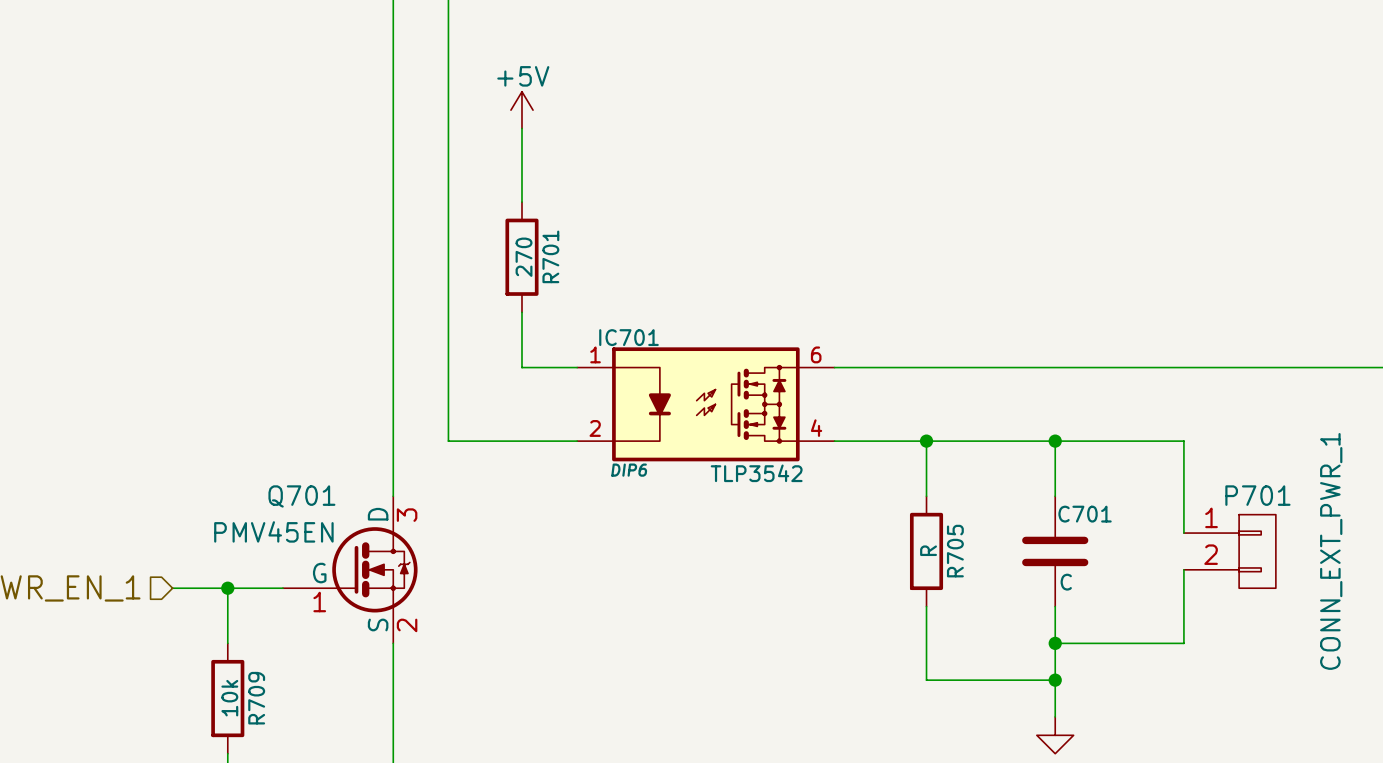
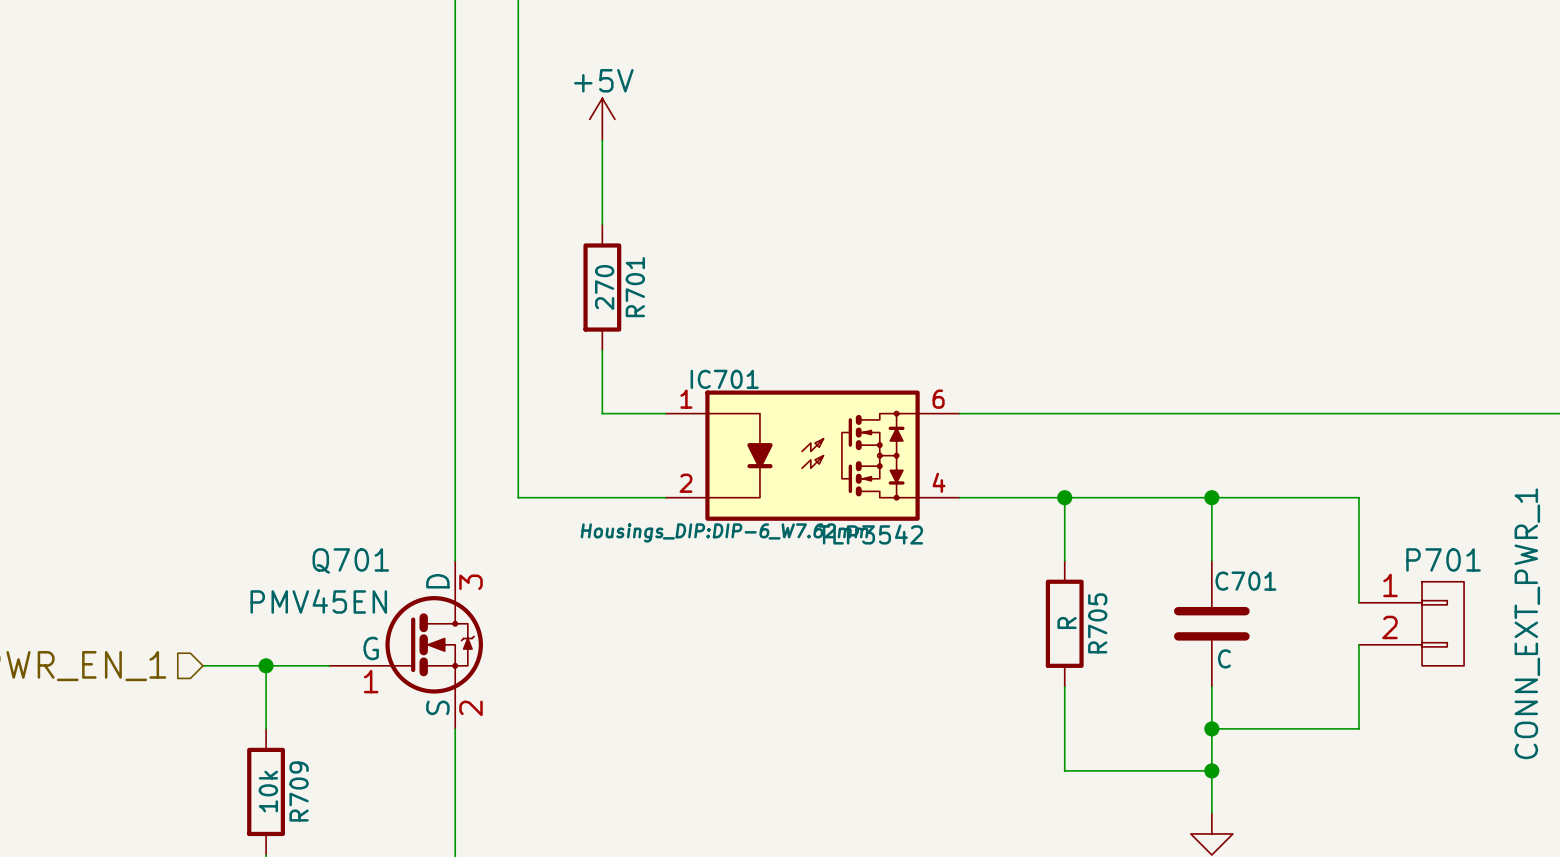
IC701 text: DIP6 (629, 470) -> Housings_DIP:DIP-6_W7.62mm (724, 532)

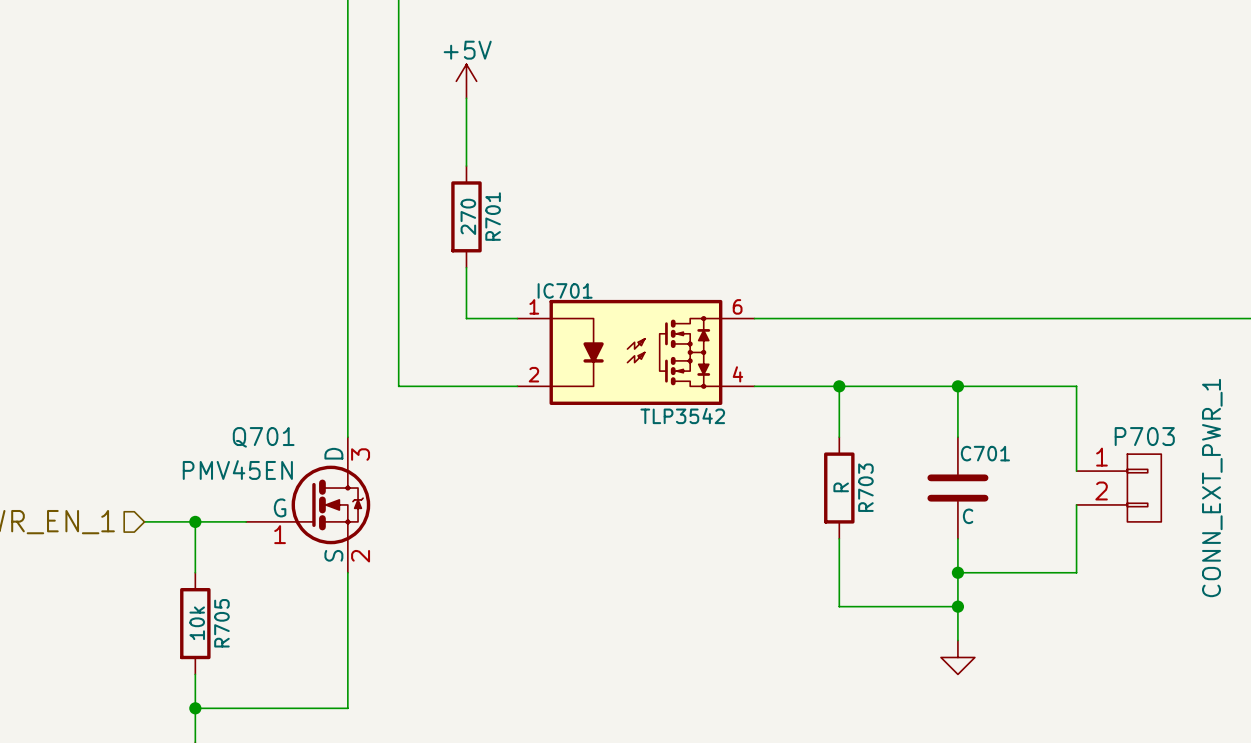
IC701 text: Housings_DIP:DIP-6_W7.62mm (724, 532) -> none
P701 name: P701 (1443, 559) -> P703 (1144, 436)
R705 name: R705 (1097, 623) -> R703 (865, 487)
R709 name: R709 (299, 791) -> R705 (221, 623)

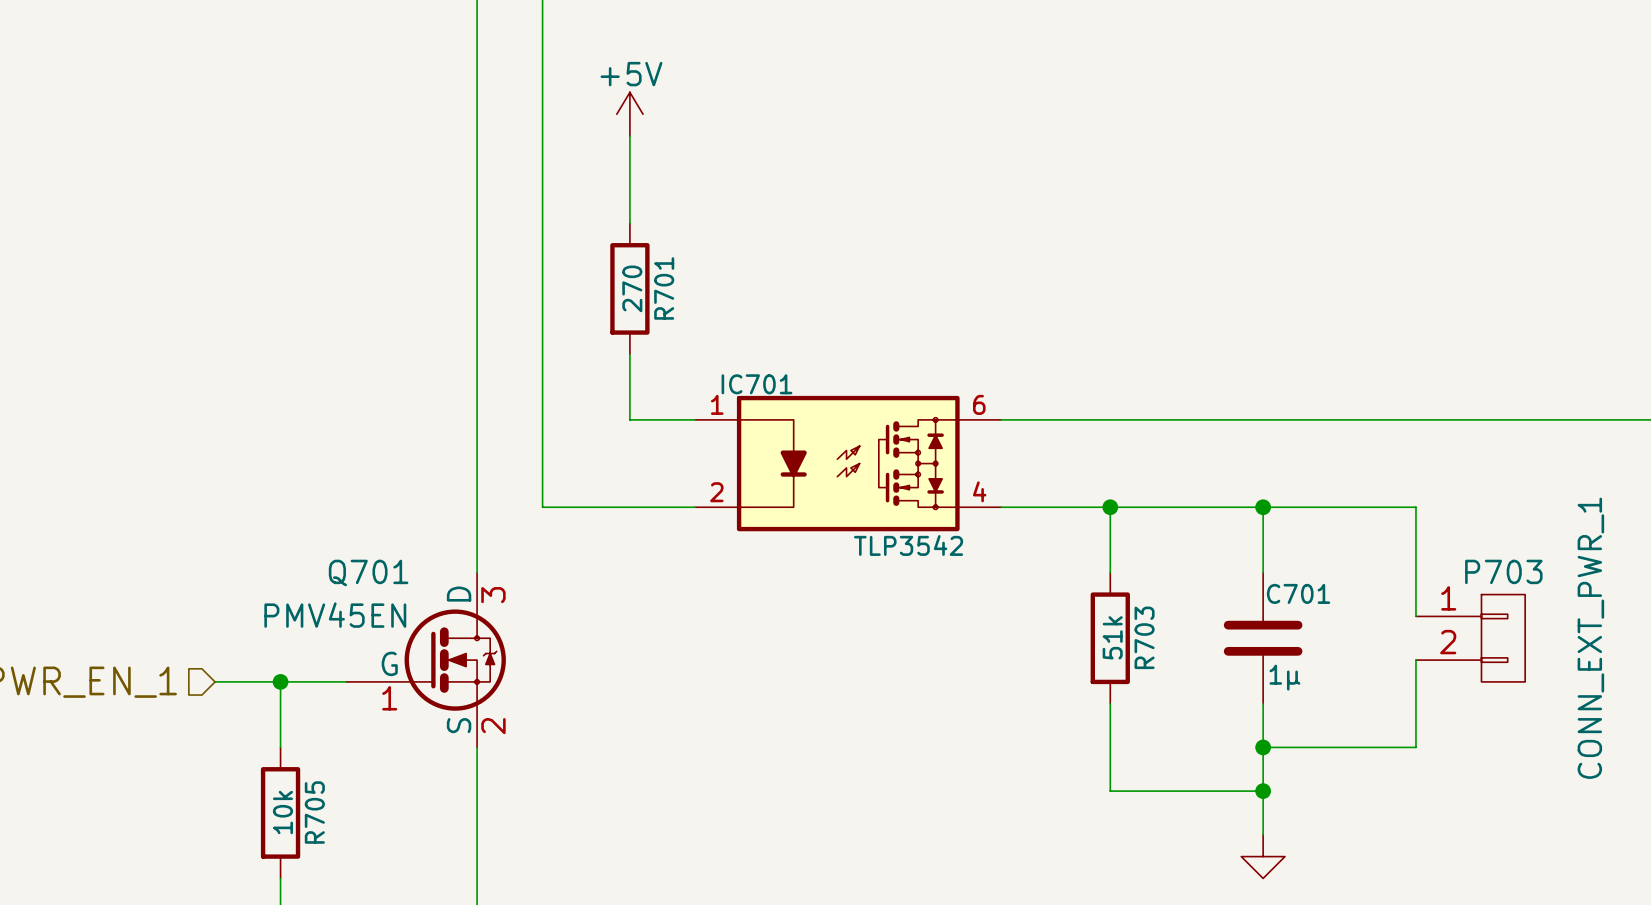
R703 value: R (841, 487) -> 51k (1112, 637)
C701 value: C (968, 516) -> 1μ (1284, 677)

